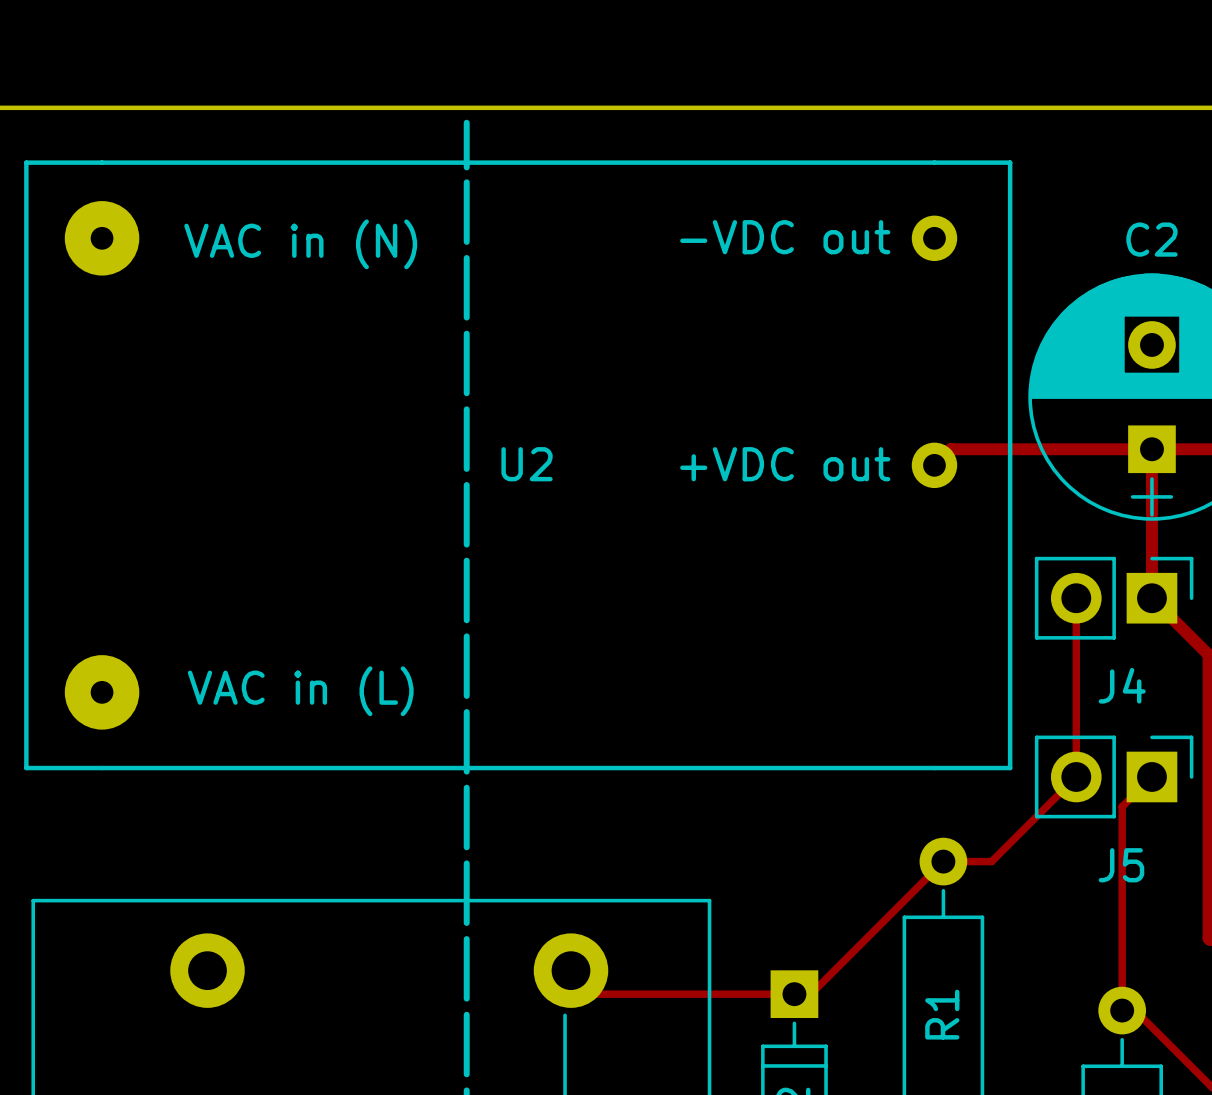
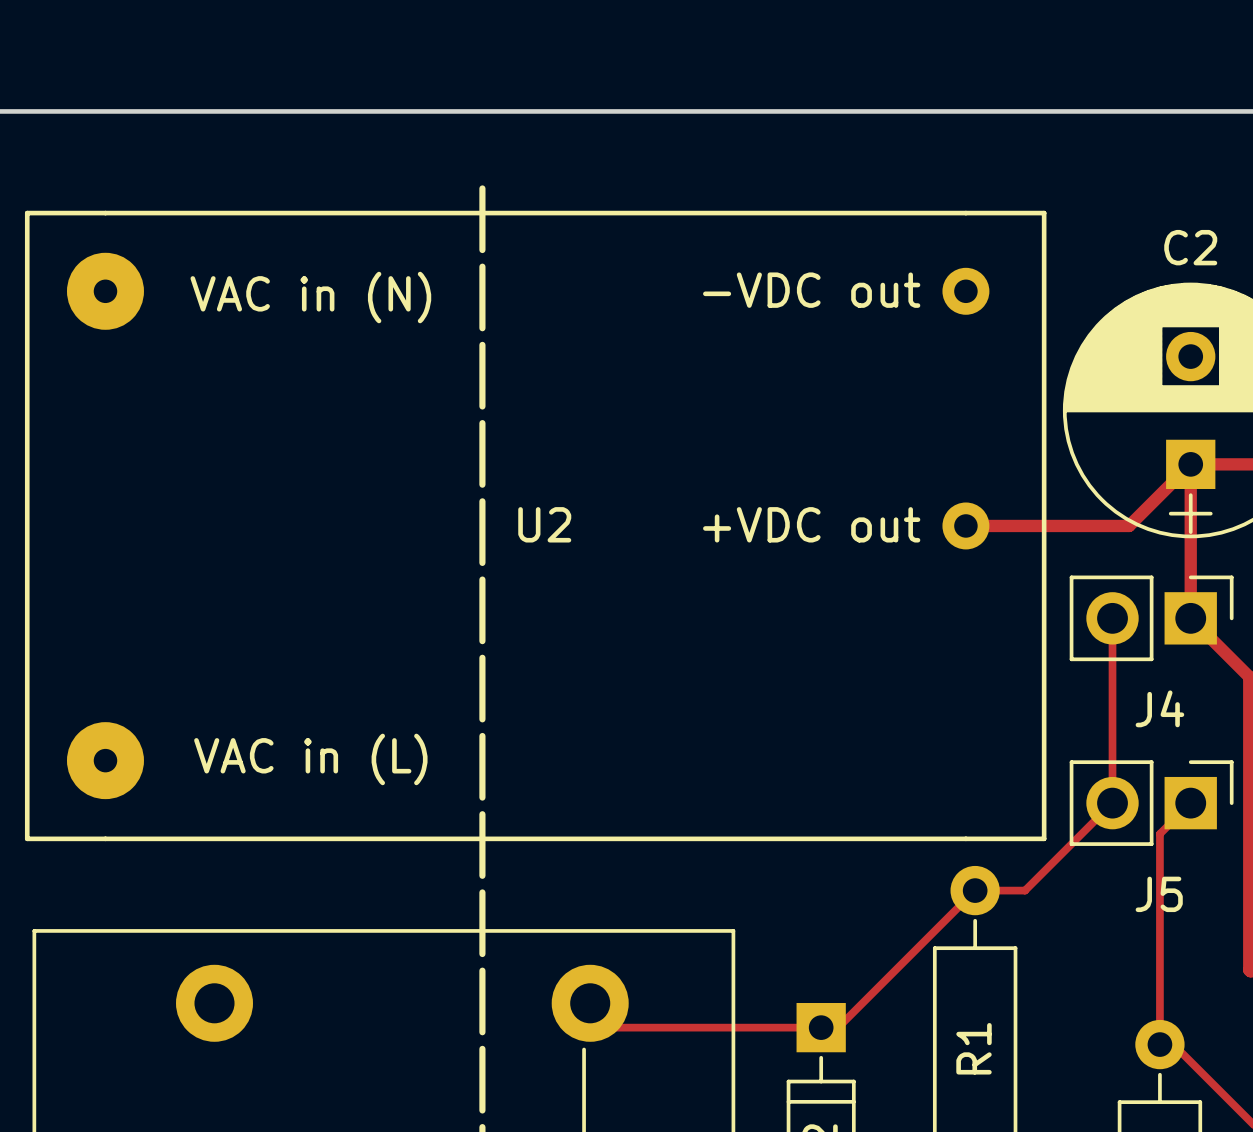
line: (466, 122) (466, 167) -> none
track: (1151, 449) (950, 449) (934, 465) -> (1190, 464) (1129, 525) (965, 525)
U2 position: (518, 465) -> (535, 525)

